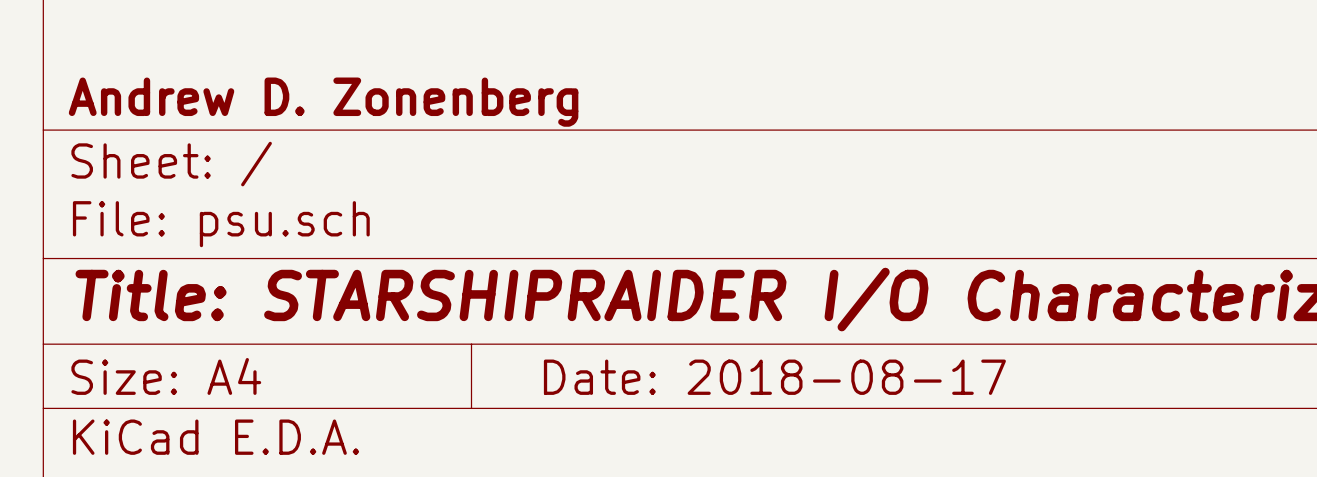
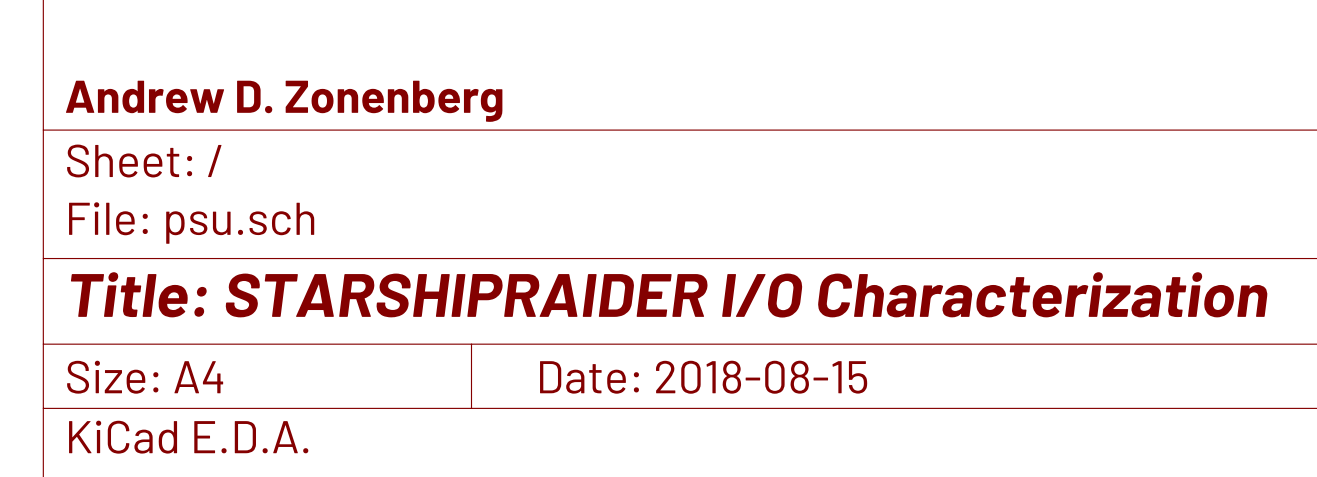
title block: Date: 2018-08-17 (774, 377) -> Date: 2018-08-15 (703, 377)

